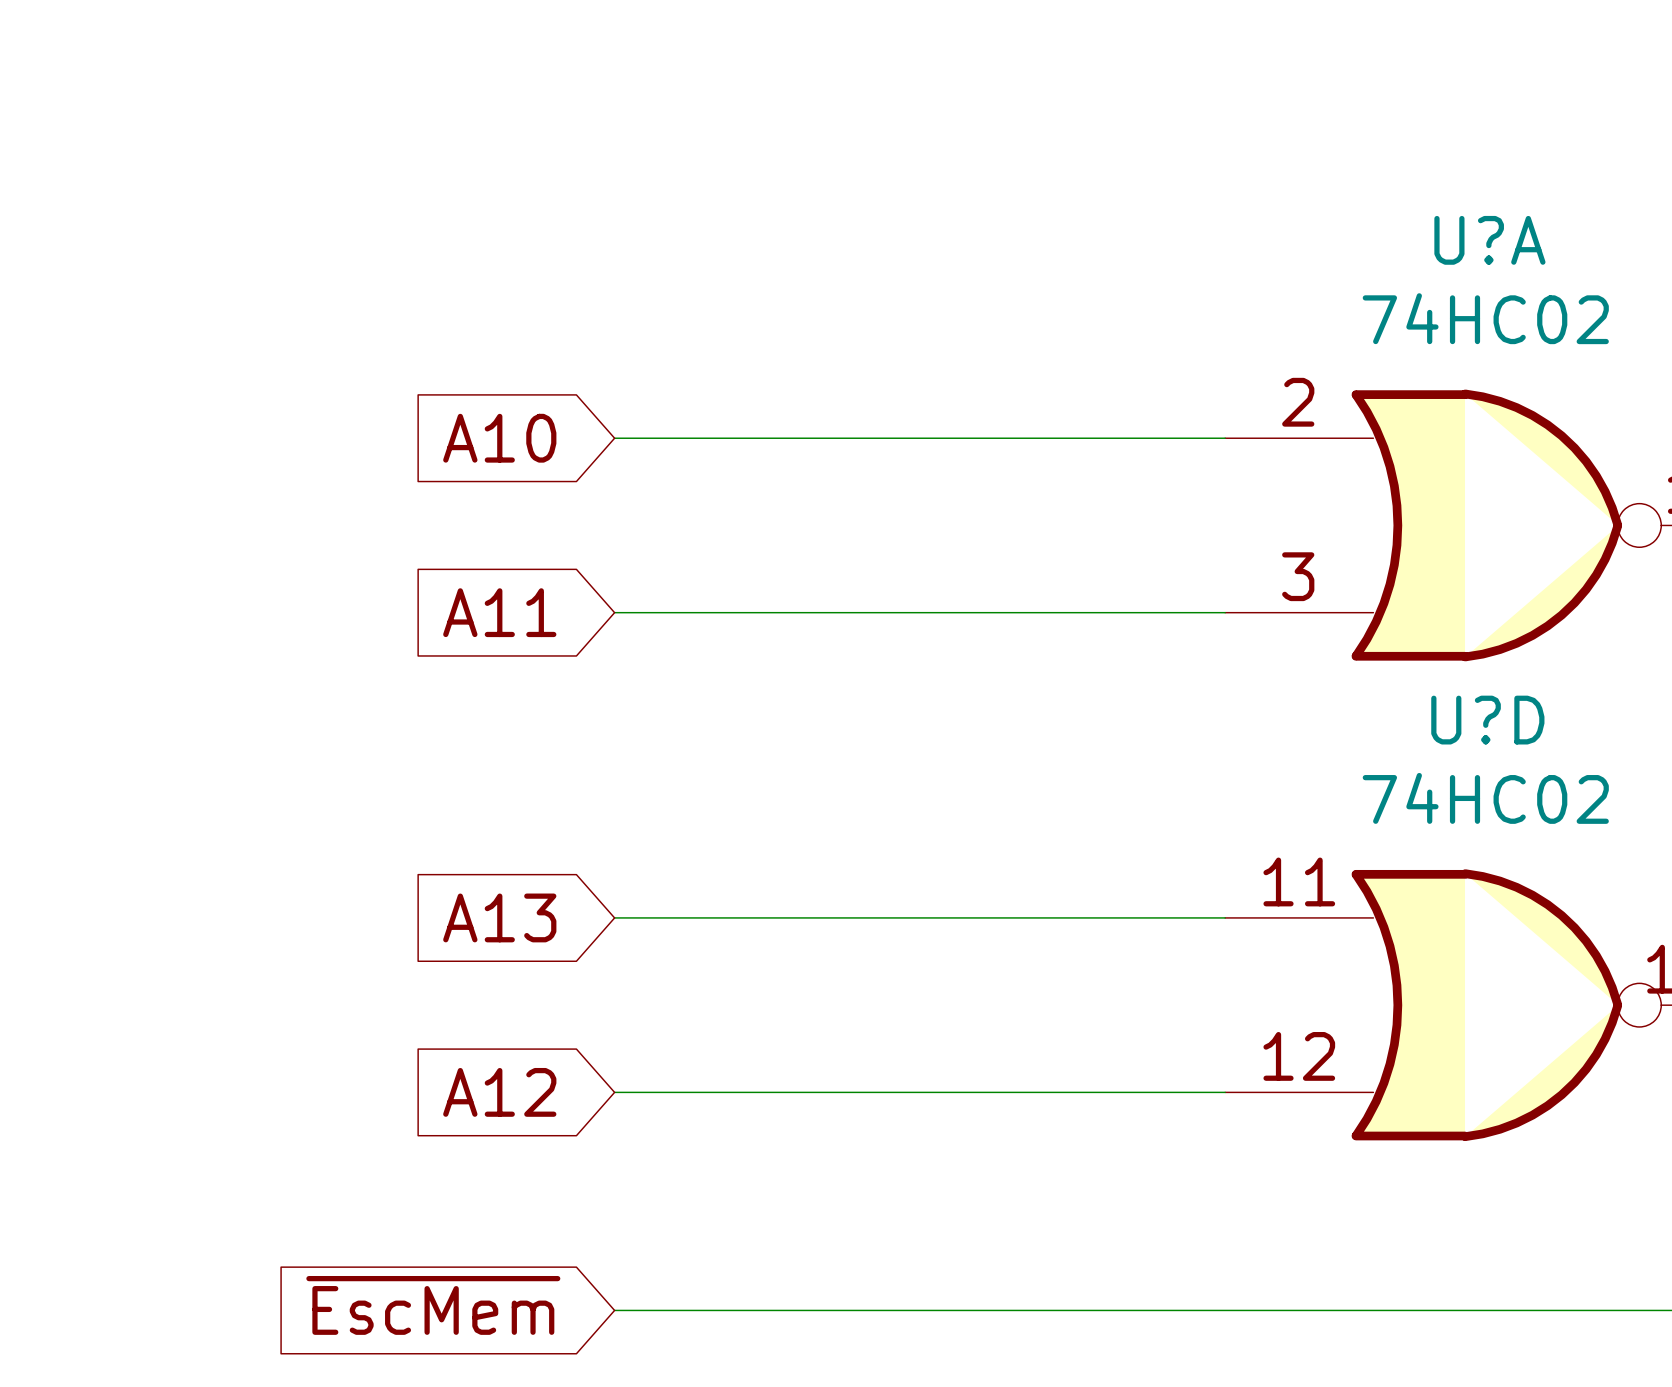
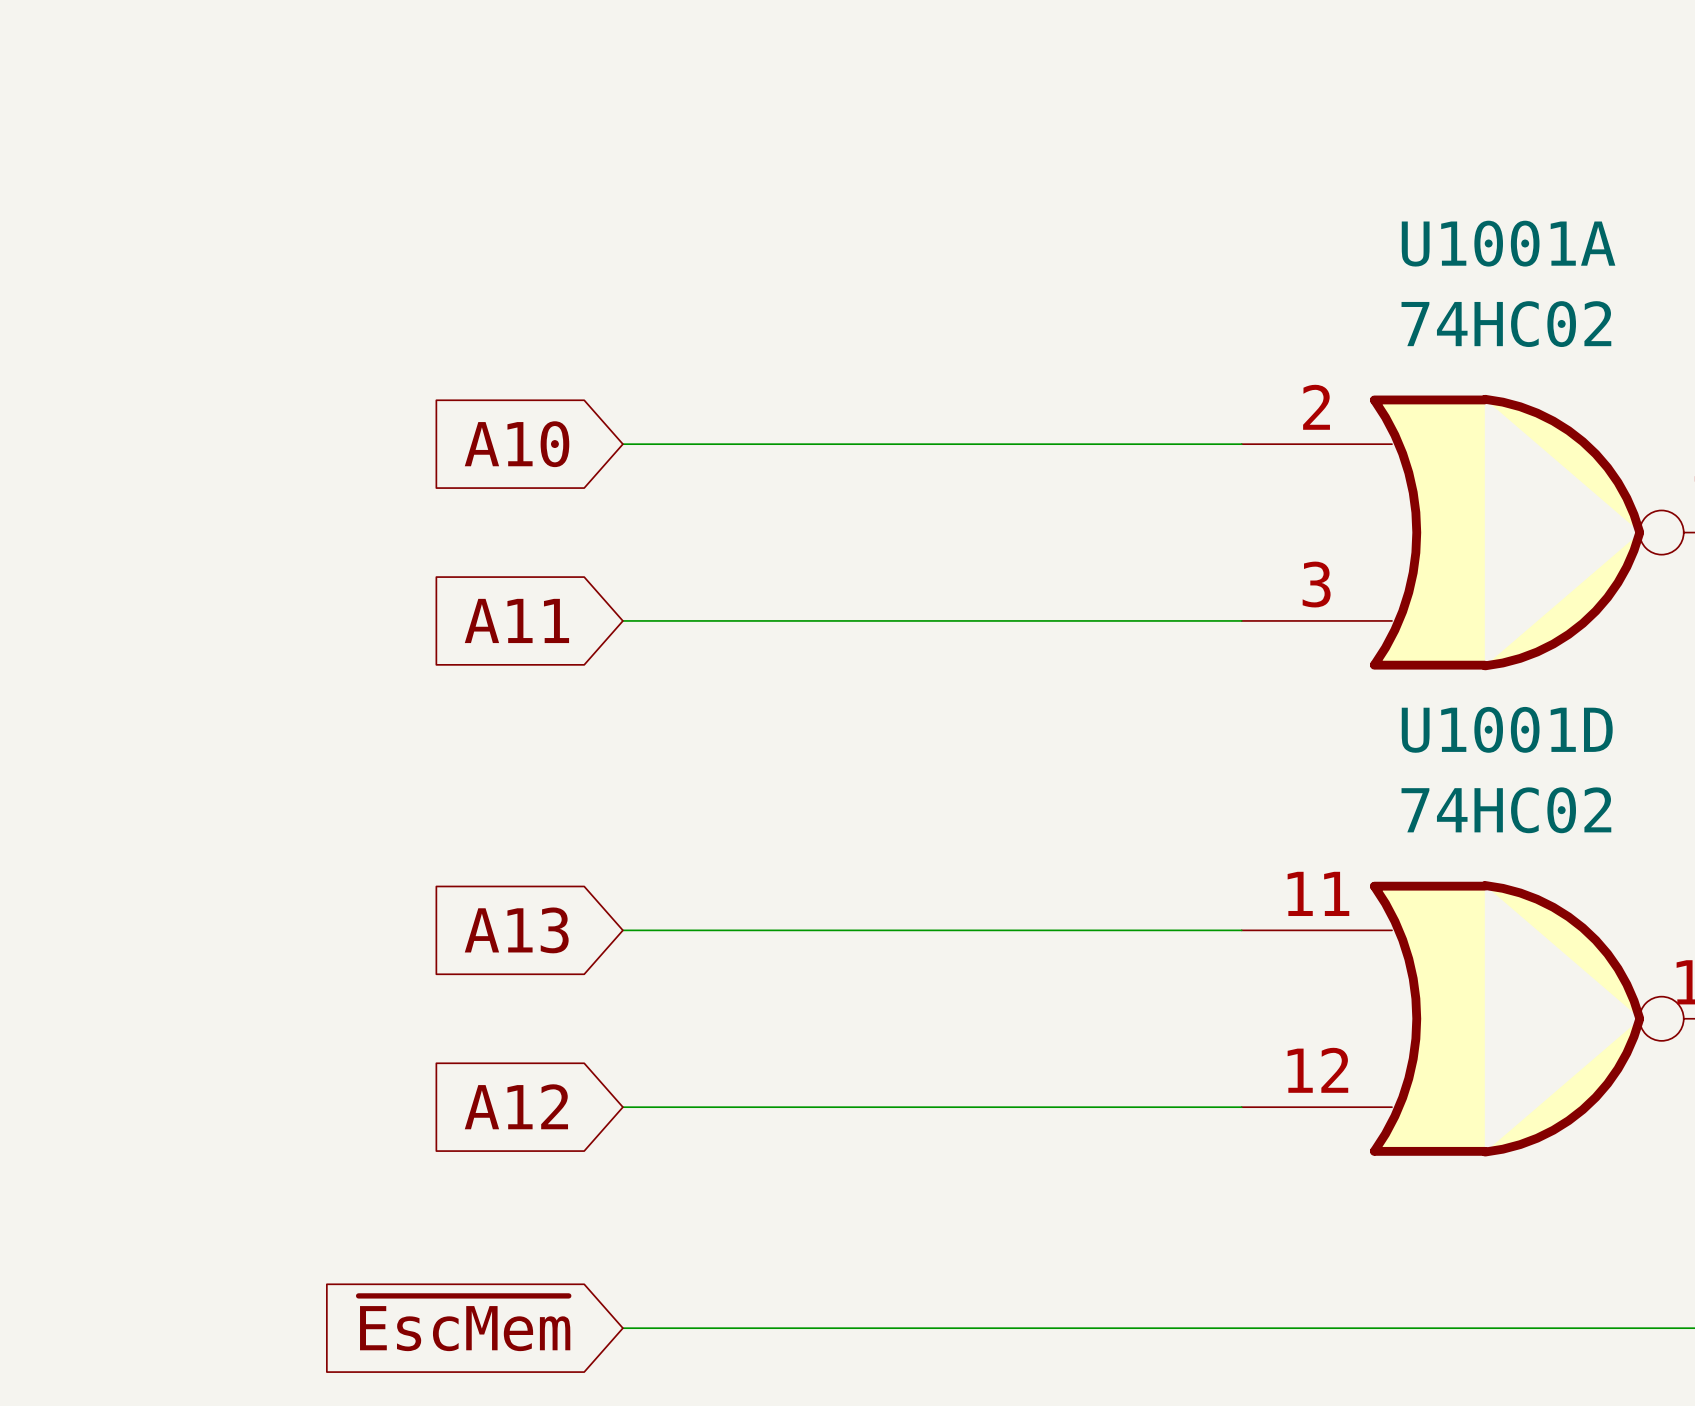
U?A name: U?A (1489, 240) -> U1001A (1508, 243)
U?D name: U?D (1487, 720) -> U1001D (1507, 729)

